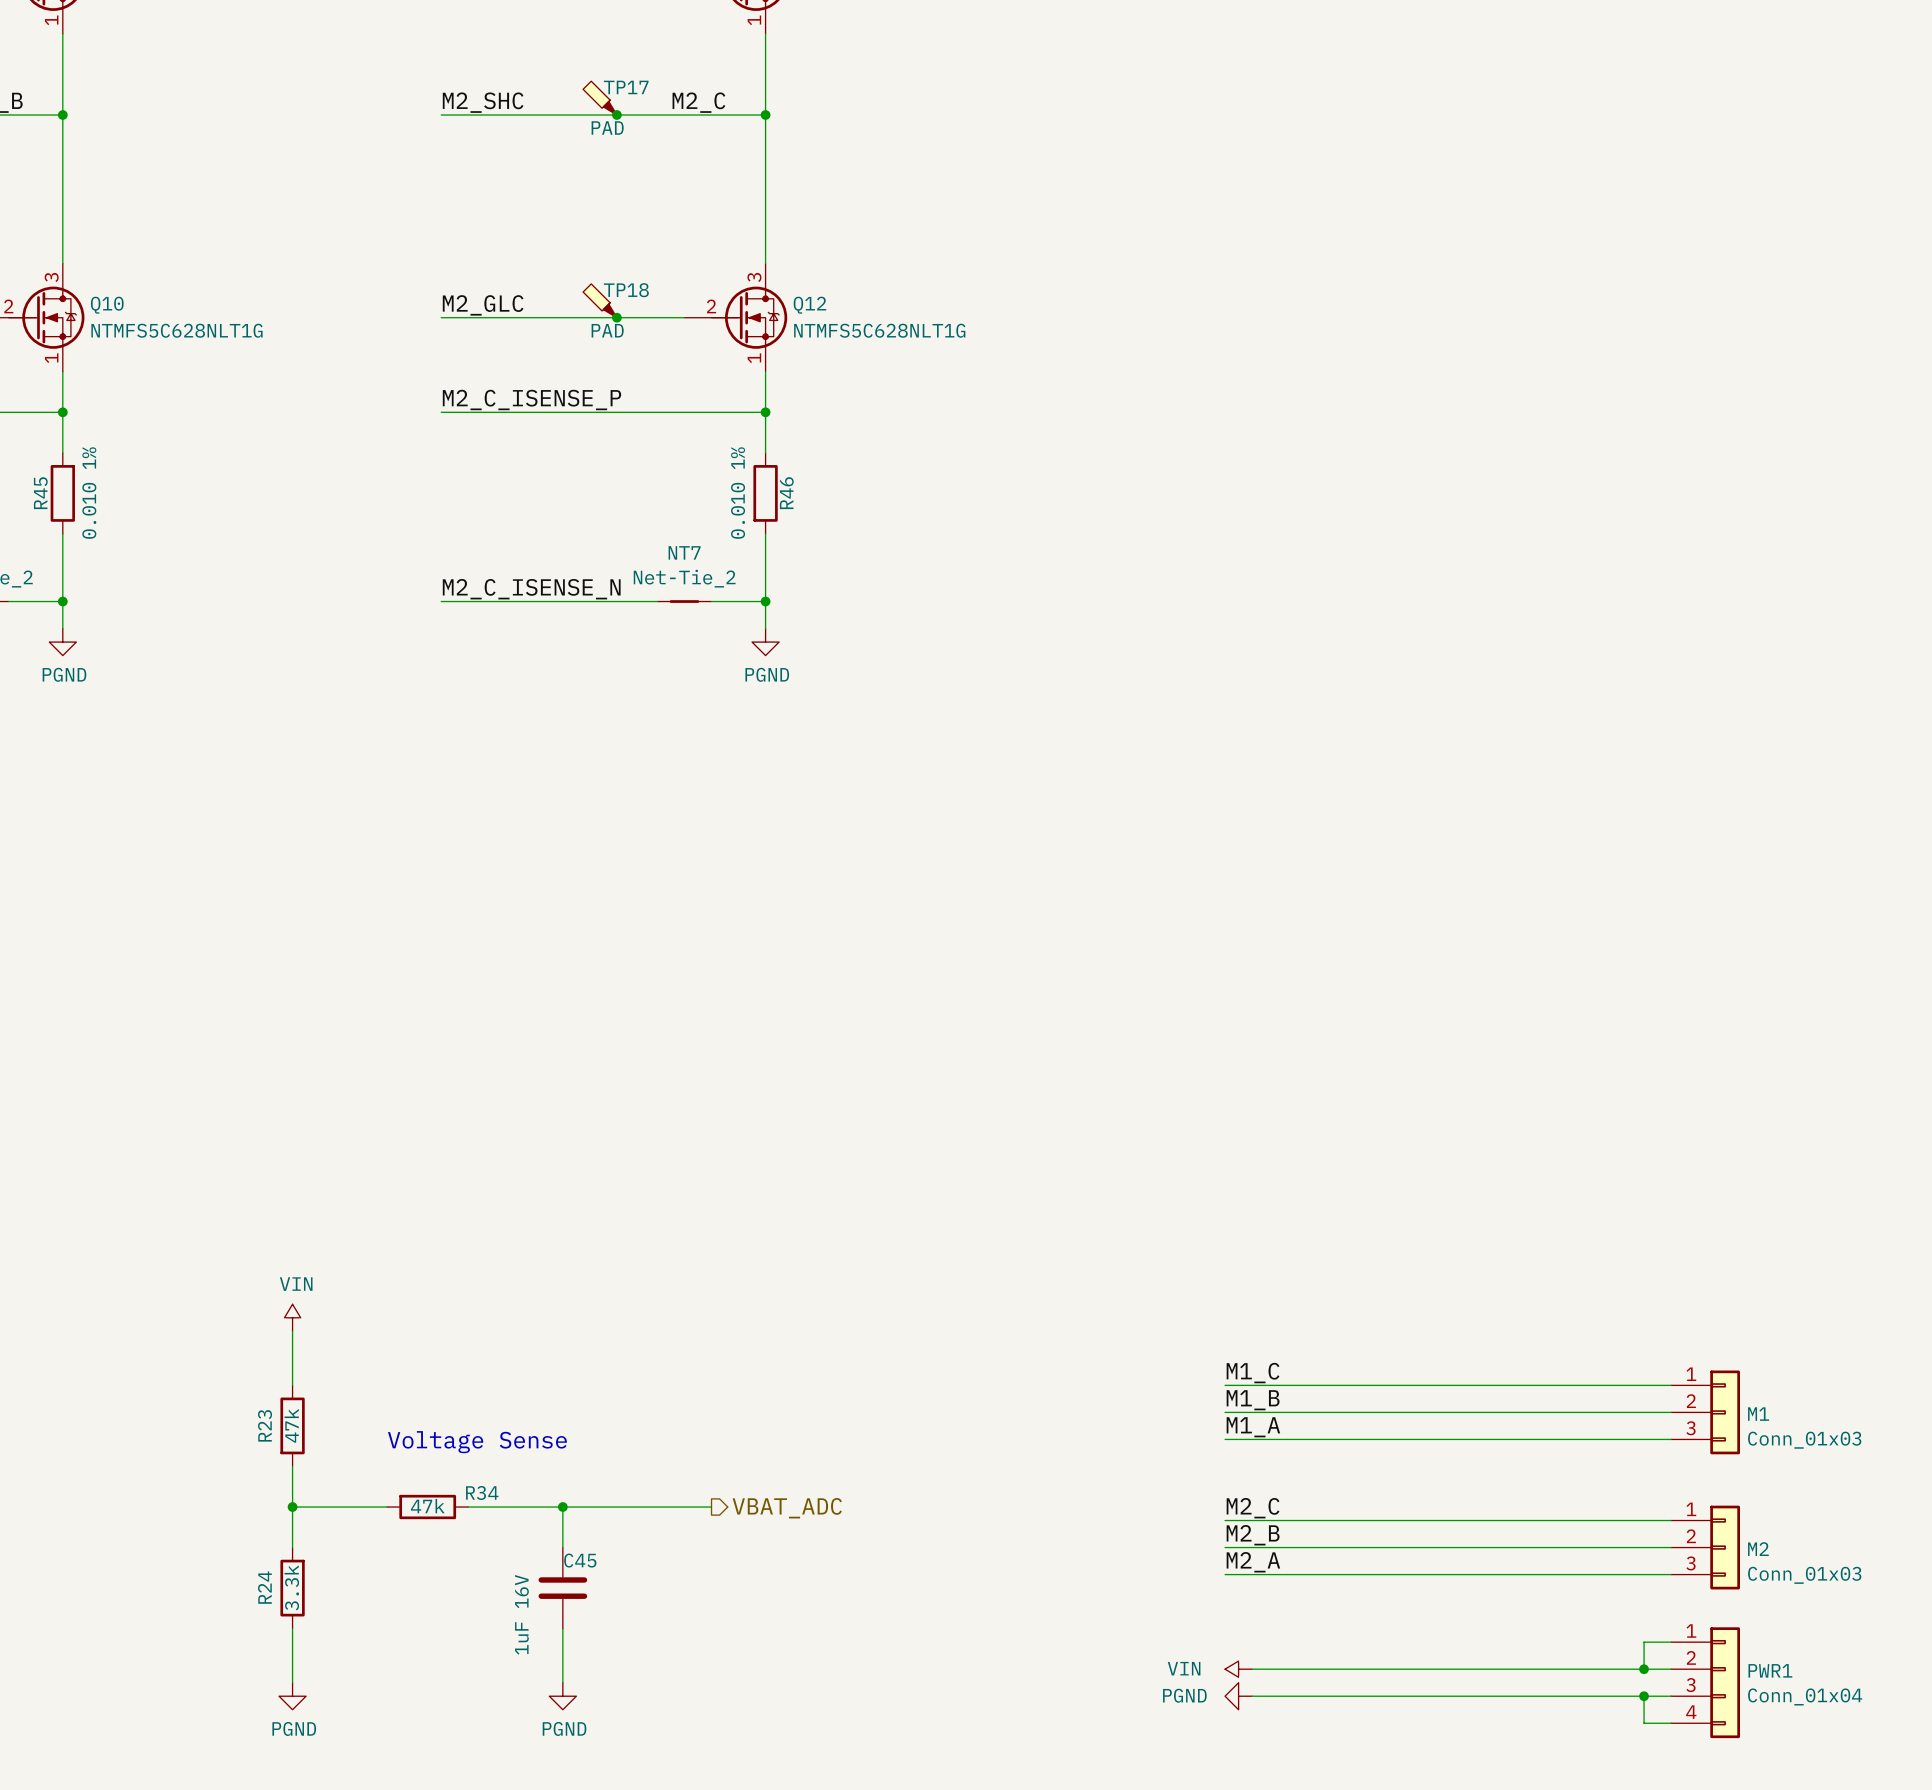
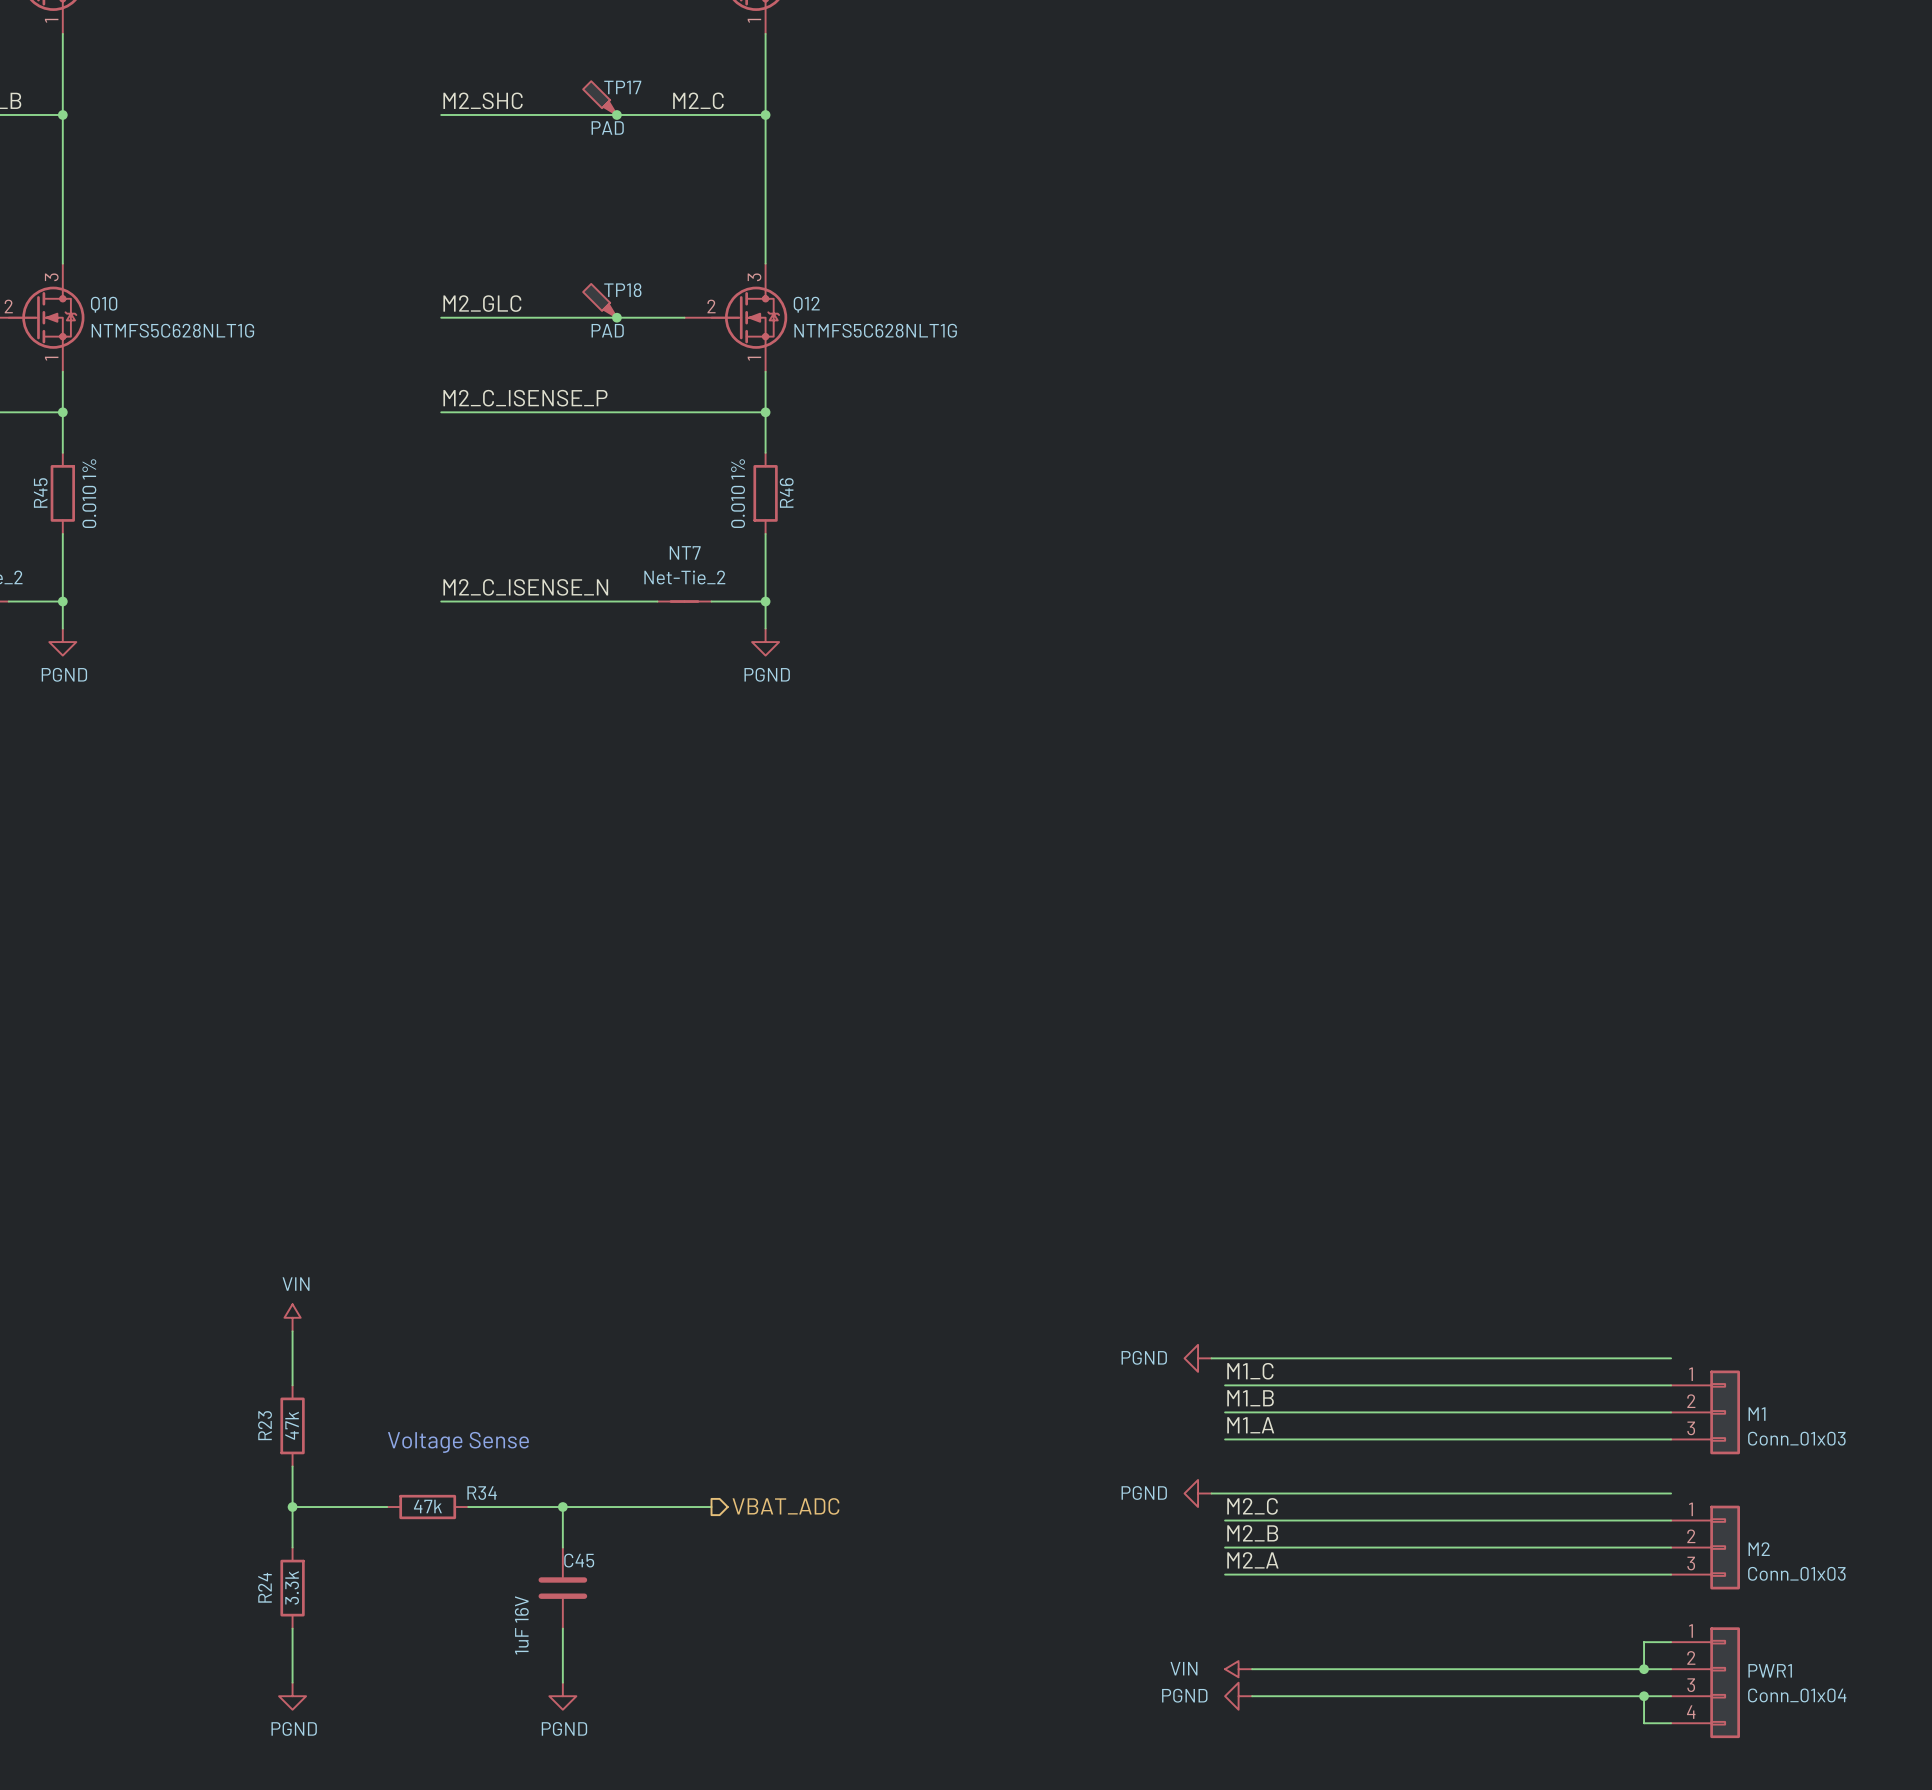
power symbol: none -> PGND (1198, 1358)
wire: none -> (1211, 1358) (1671, 1358)
power symbol: none -> PGND (1198, 1493)
wire: none -> (1211, 1493) (1671, 1493)

